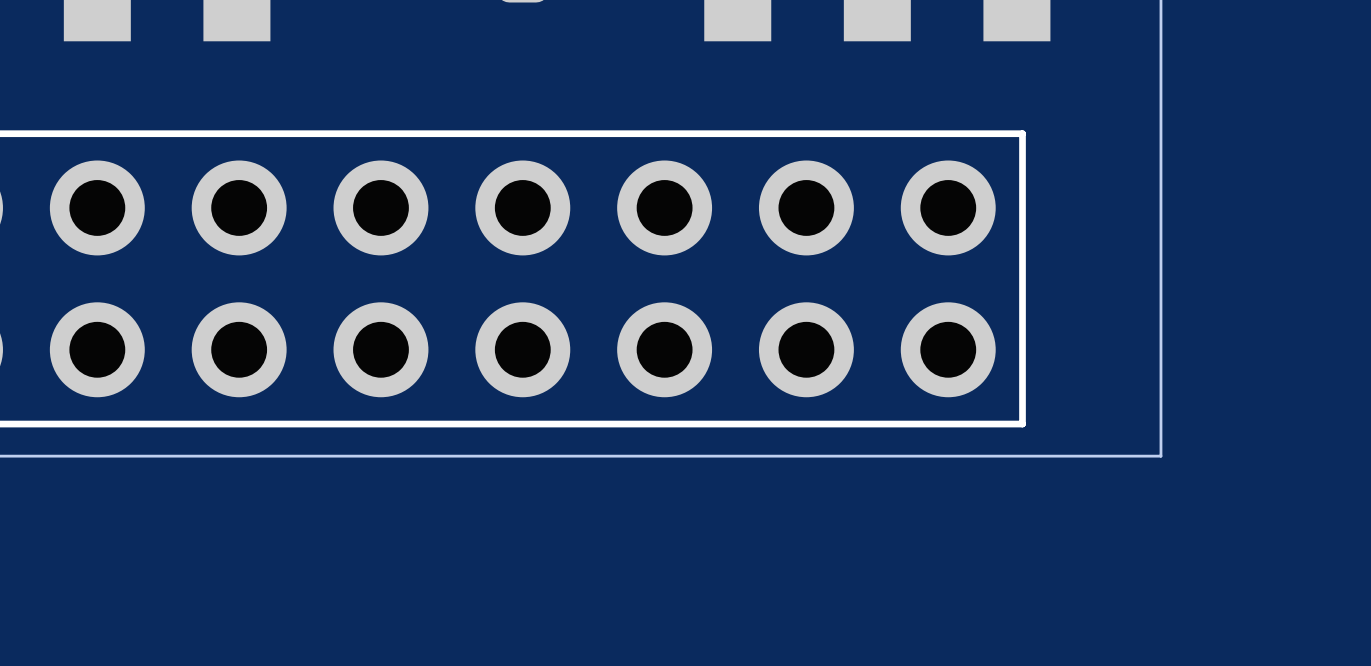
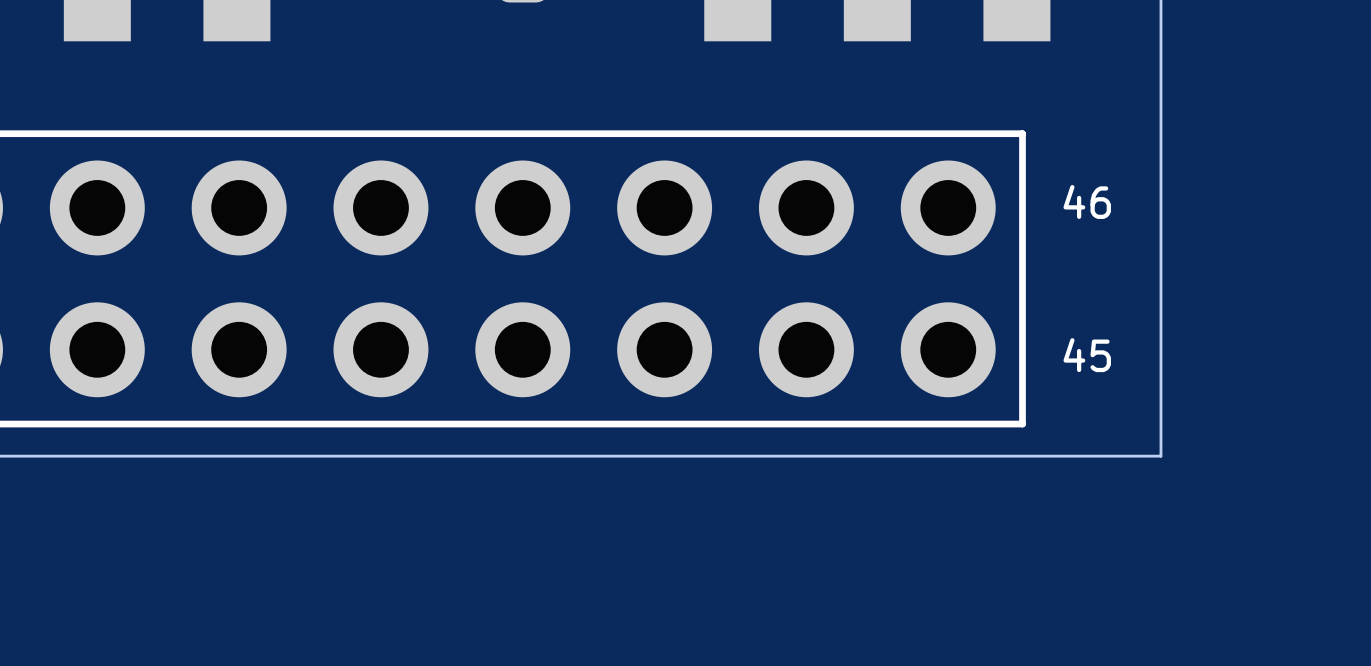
text: none -> 46 (1087, 201)
text: none -> 45 (1087, 355)

